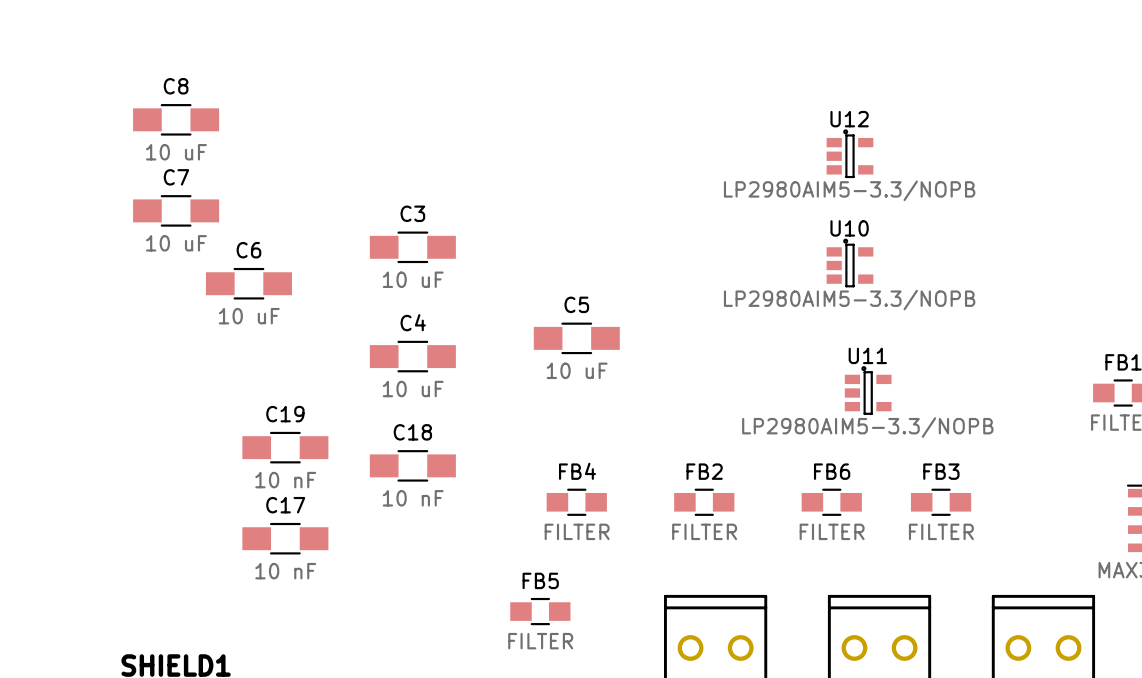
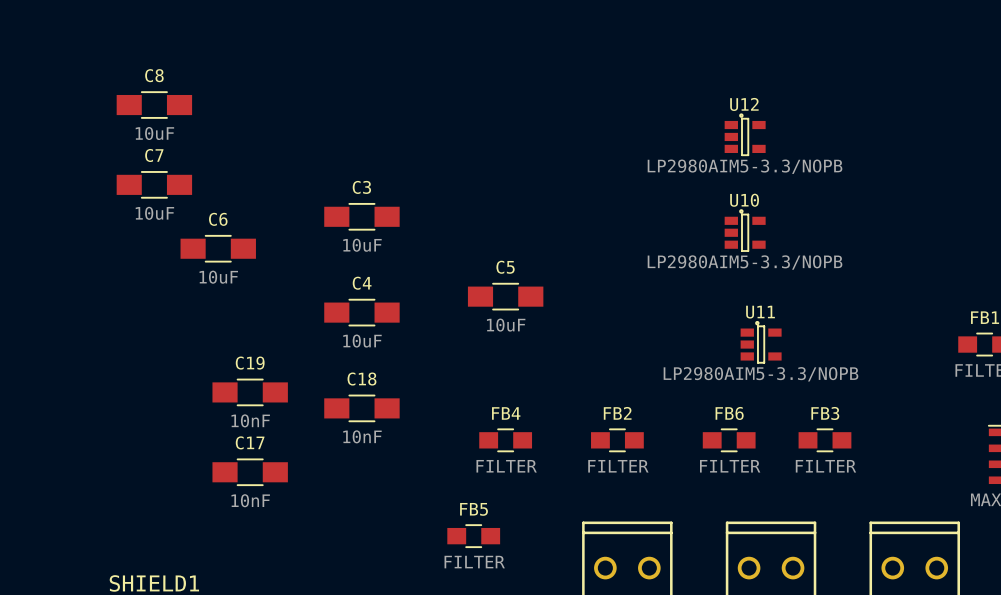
C8 value: 10 uF (176, 152) -> 10uF (154, 133)
C7 value: 10 uF (176, 243) -> 10uF (154, 213)
C3 value: 10 uF (413, 279) -> 10uF (362, 245)
C6 value: 10 uF (249, 316) -> 10uF (218, 277)
C5 value: 10 uF (577, 370) -> 10uF (506, 325)
C4 value: 10 uF (413, 389) -> 10uF (362, 341)
C19 value: 10 nF (285, 480) -> 10nF (250, 420)
C18 value: 10 nF (413, 498) -> 10nF (362, 436)
C17 value: 10 nF (285, 571) -> 10nF (250, 500)

